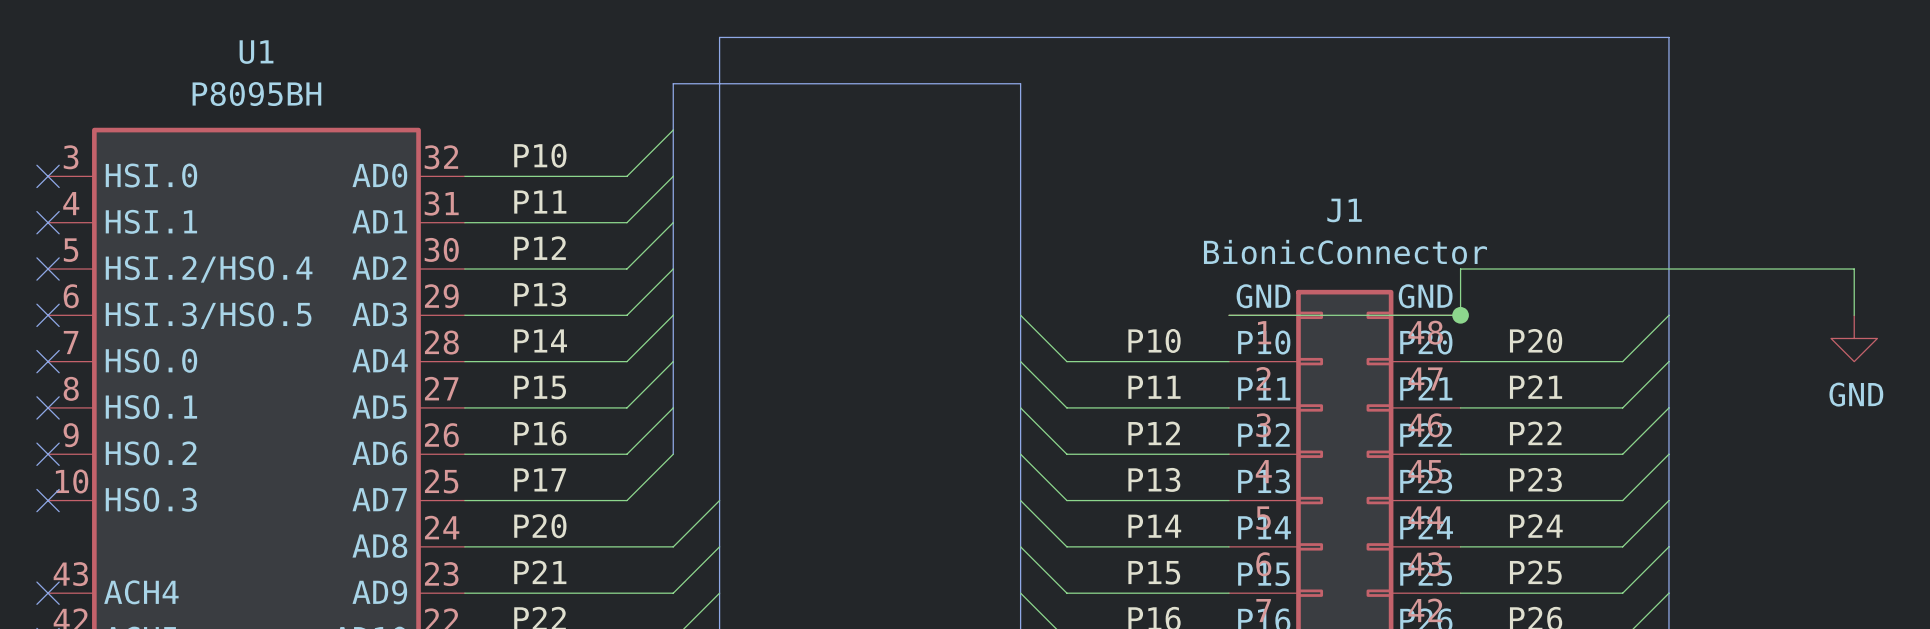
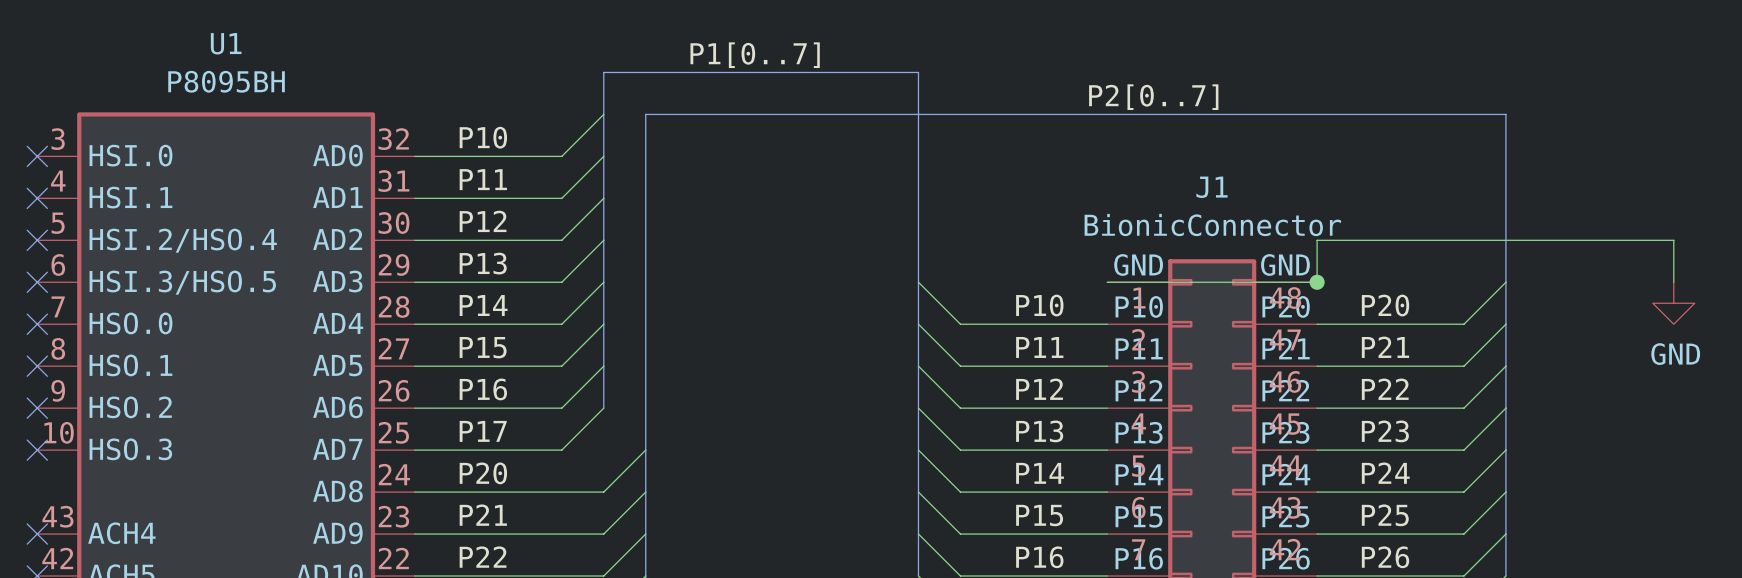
label: none -> P1[0..7] (755, 55)
label: none -> P2[0..7] (1153, 97)
bus: (719, 130) (719, 37) (1668, 37) (1668, 130) -> (645, 114) (1505, 114)

